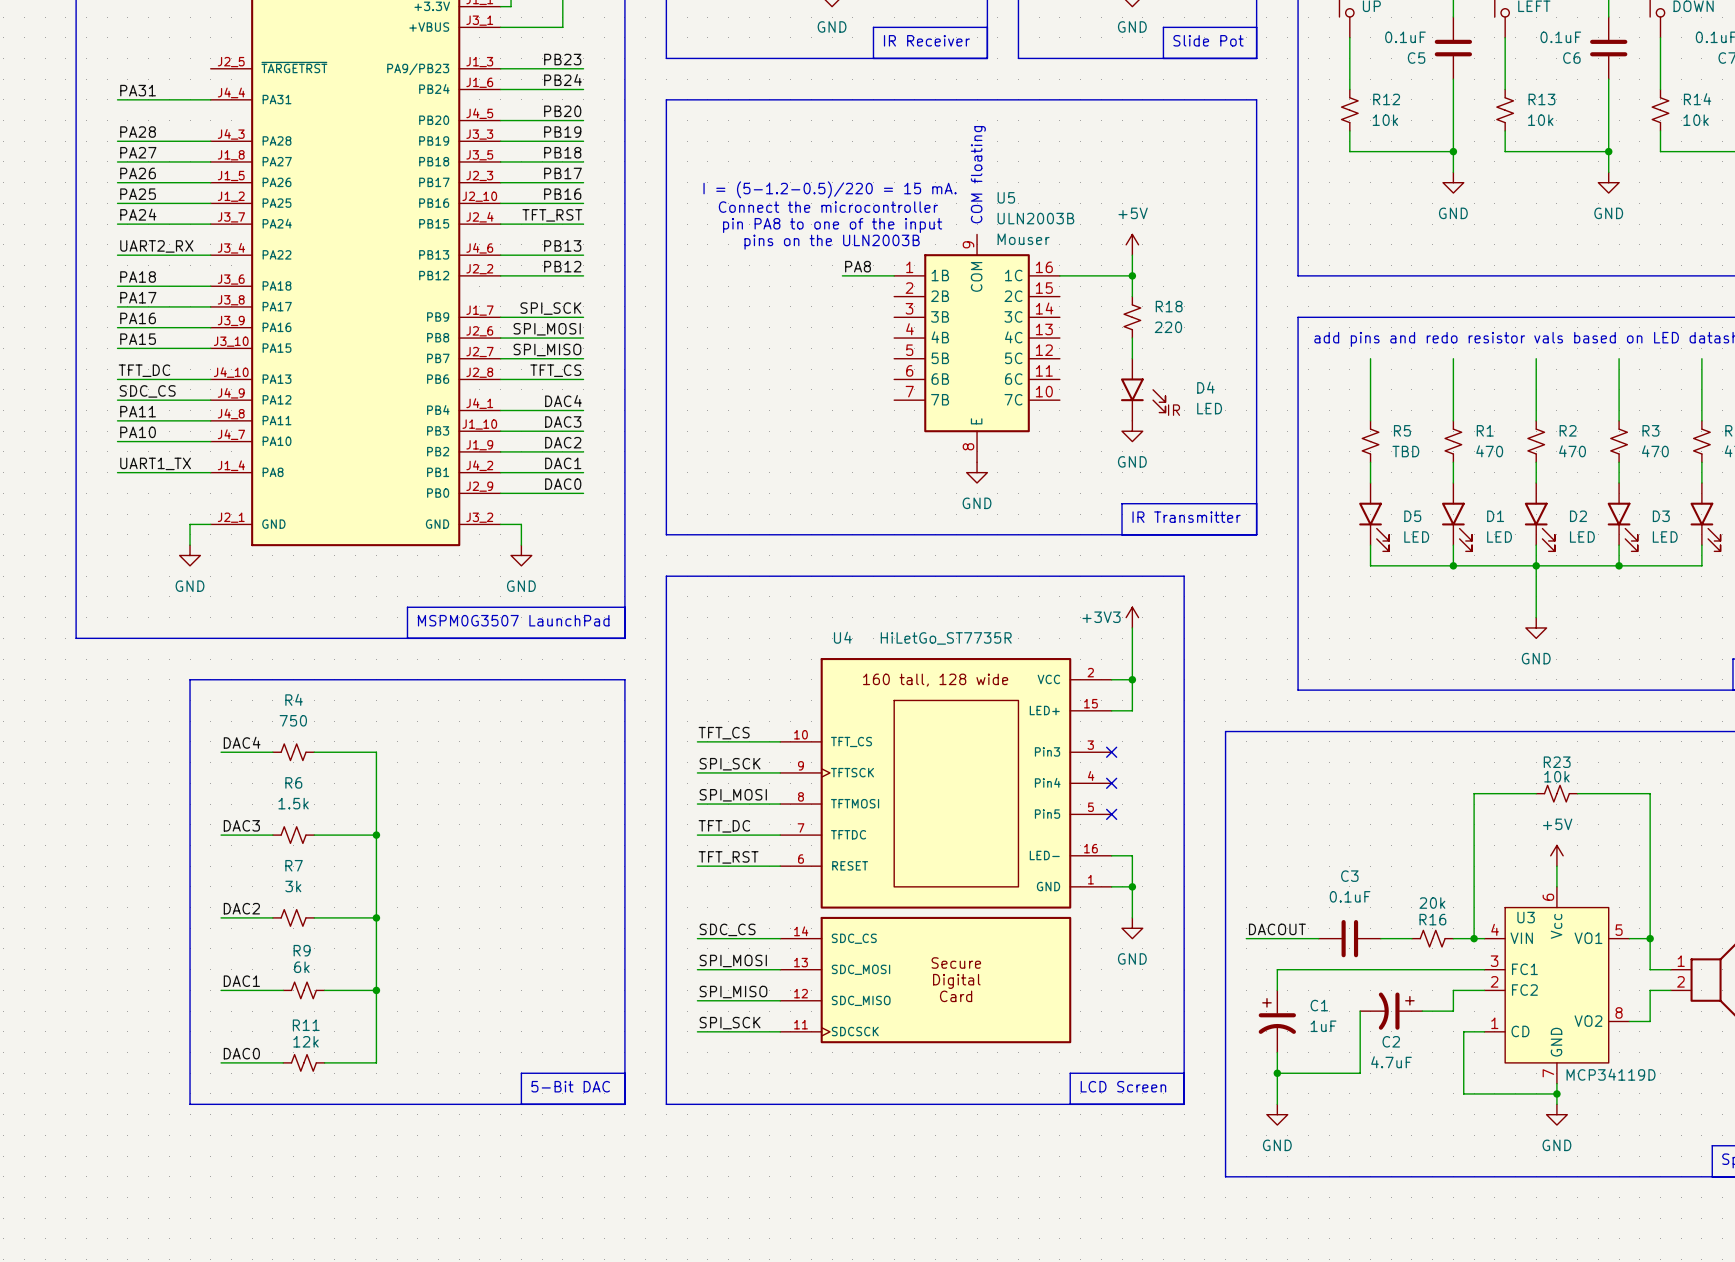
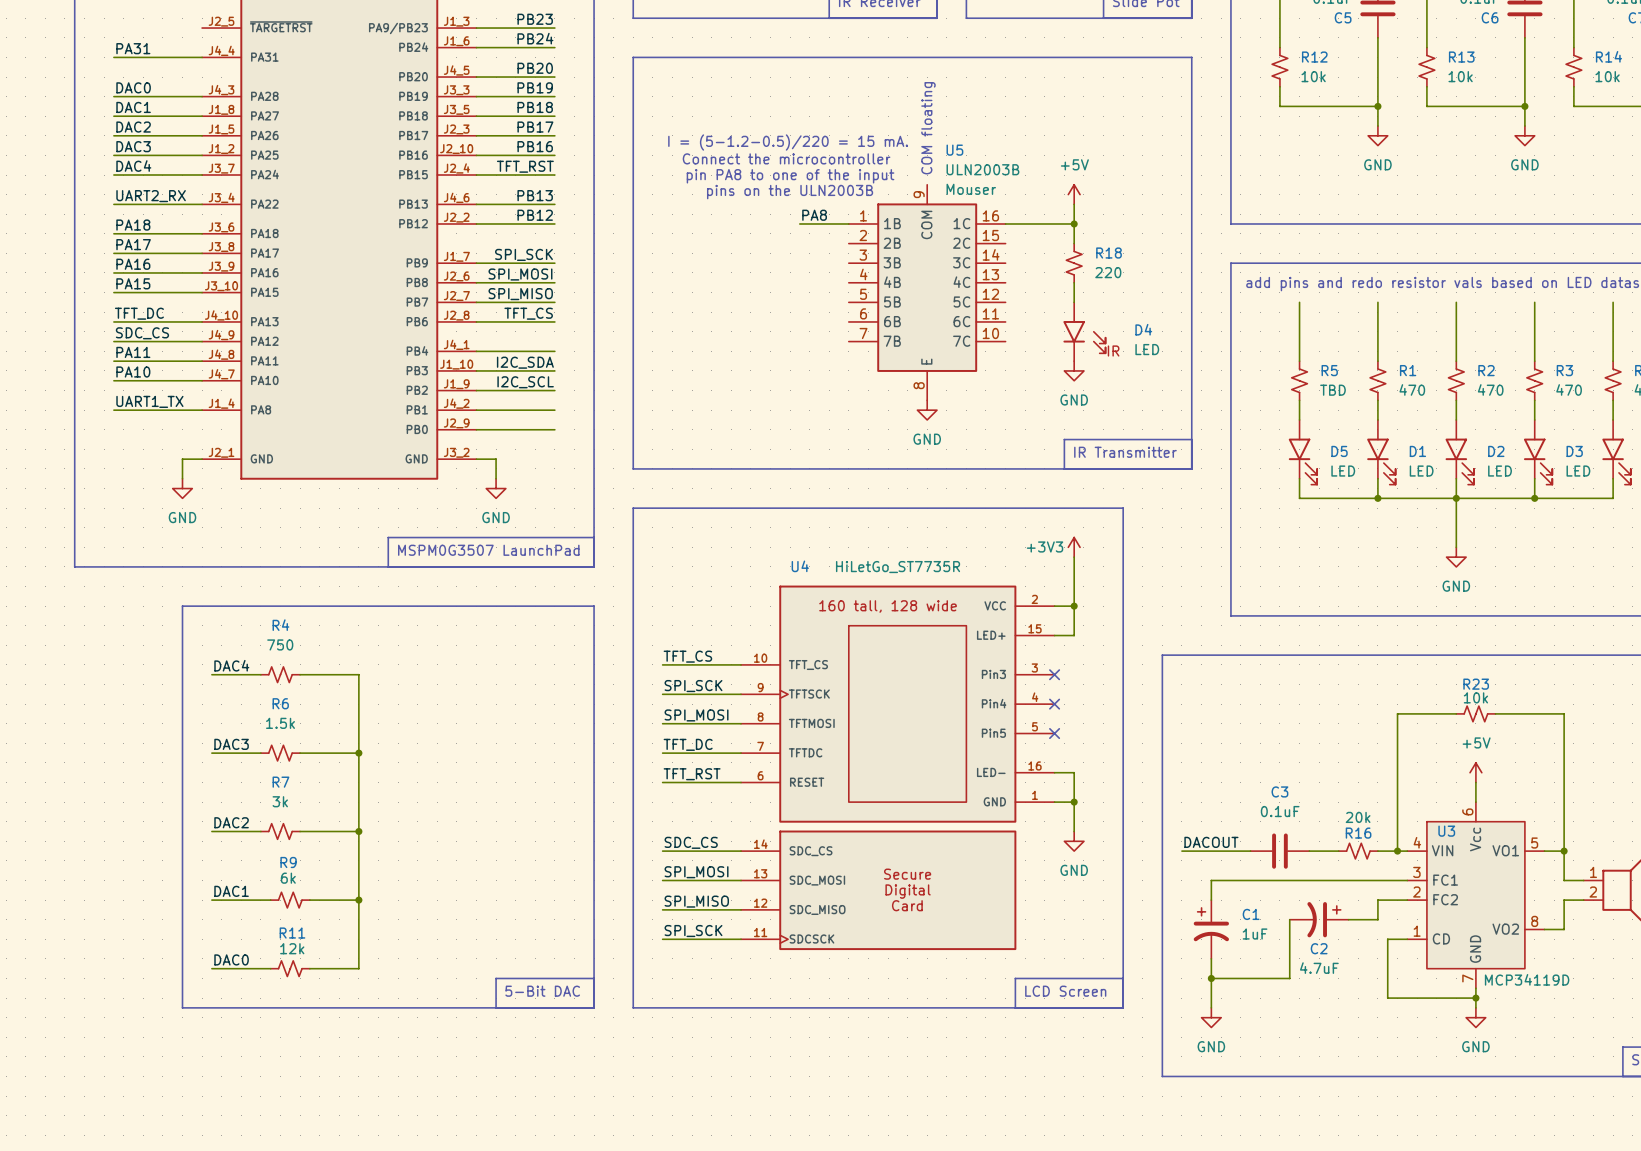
label: PA28 (138, 132) -> DAC0 (133, 87)
label: PA27 (138, 152) -> DAC1 (133, 107)
label: PA26 (138, 173) -> DAC2 (133, 127)
label: PA25 (138, 194) -> DAC3 (133, 146)
label: PA24 (138, 214) -> DAC4 (133, 166)
label: DAC4 (563, 401) -> none
label: DAC3 (563, 421) -> I2C_SDA (525, 362)
label: DAC2 (563, 442) -> I2C_SCL (525, 382)
label: DAC1 (563, 463) -> none
label: DAC0 (563, 484) -> none

